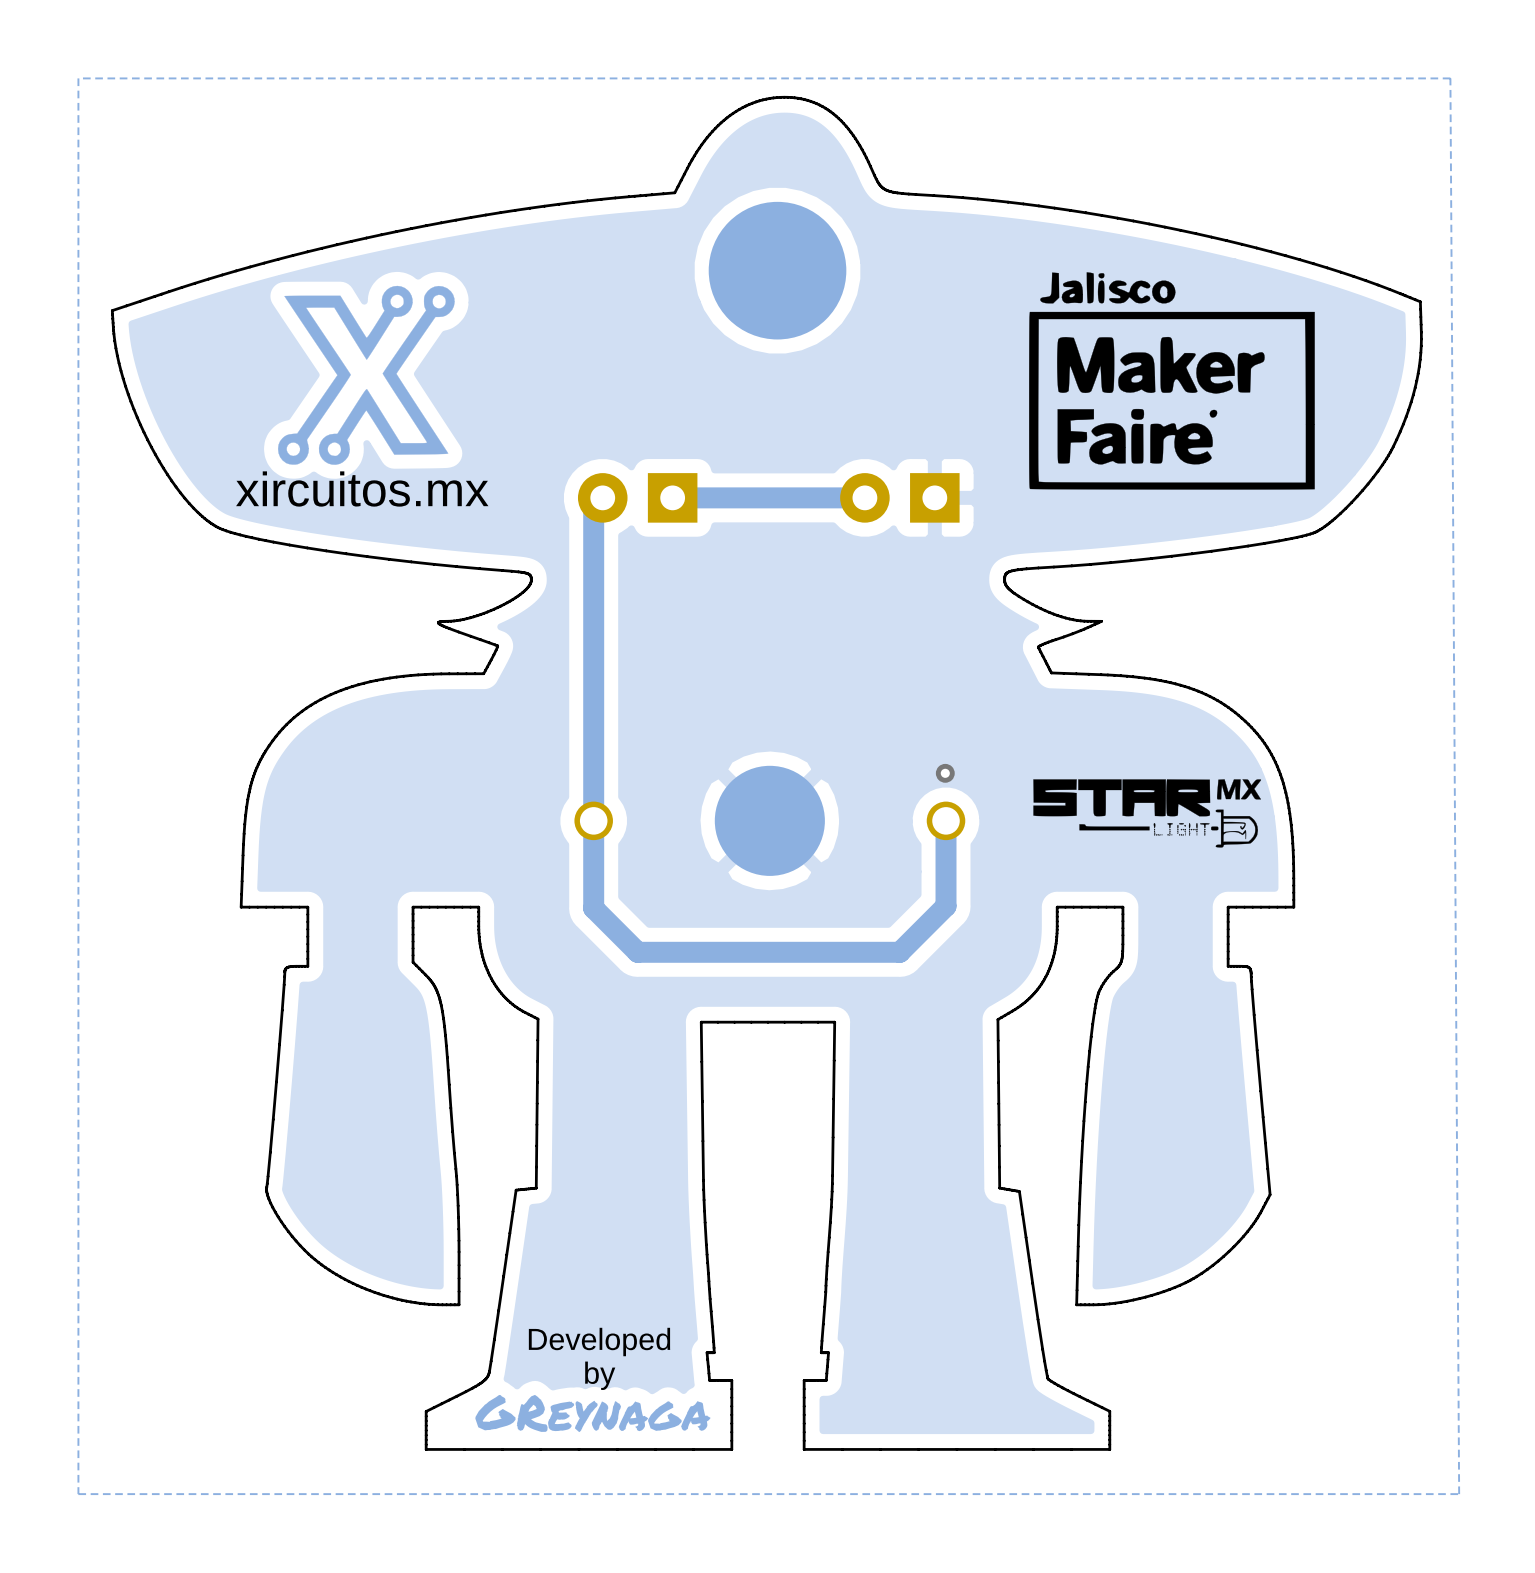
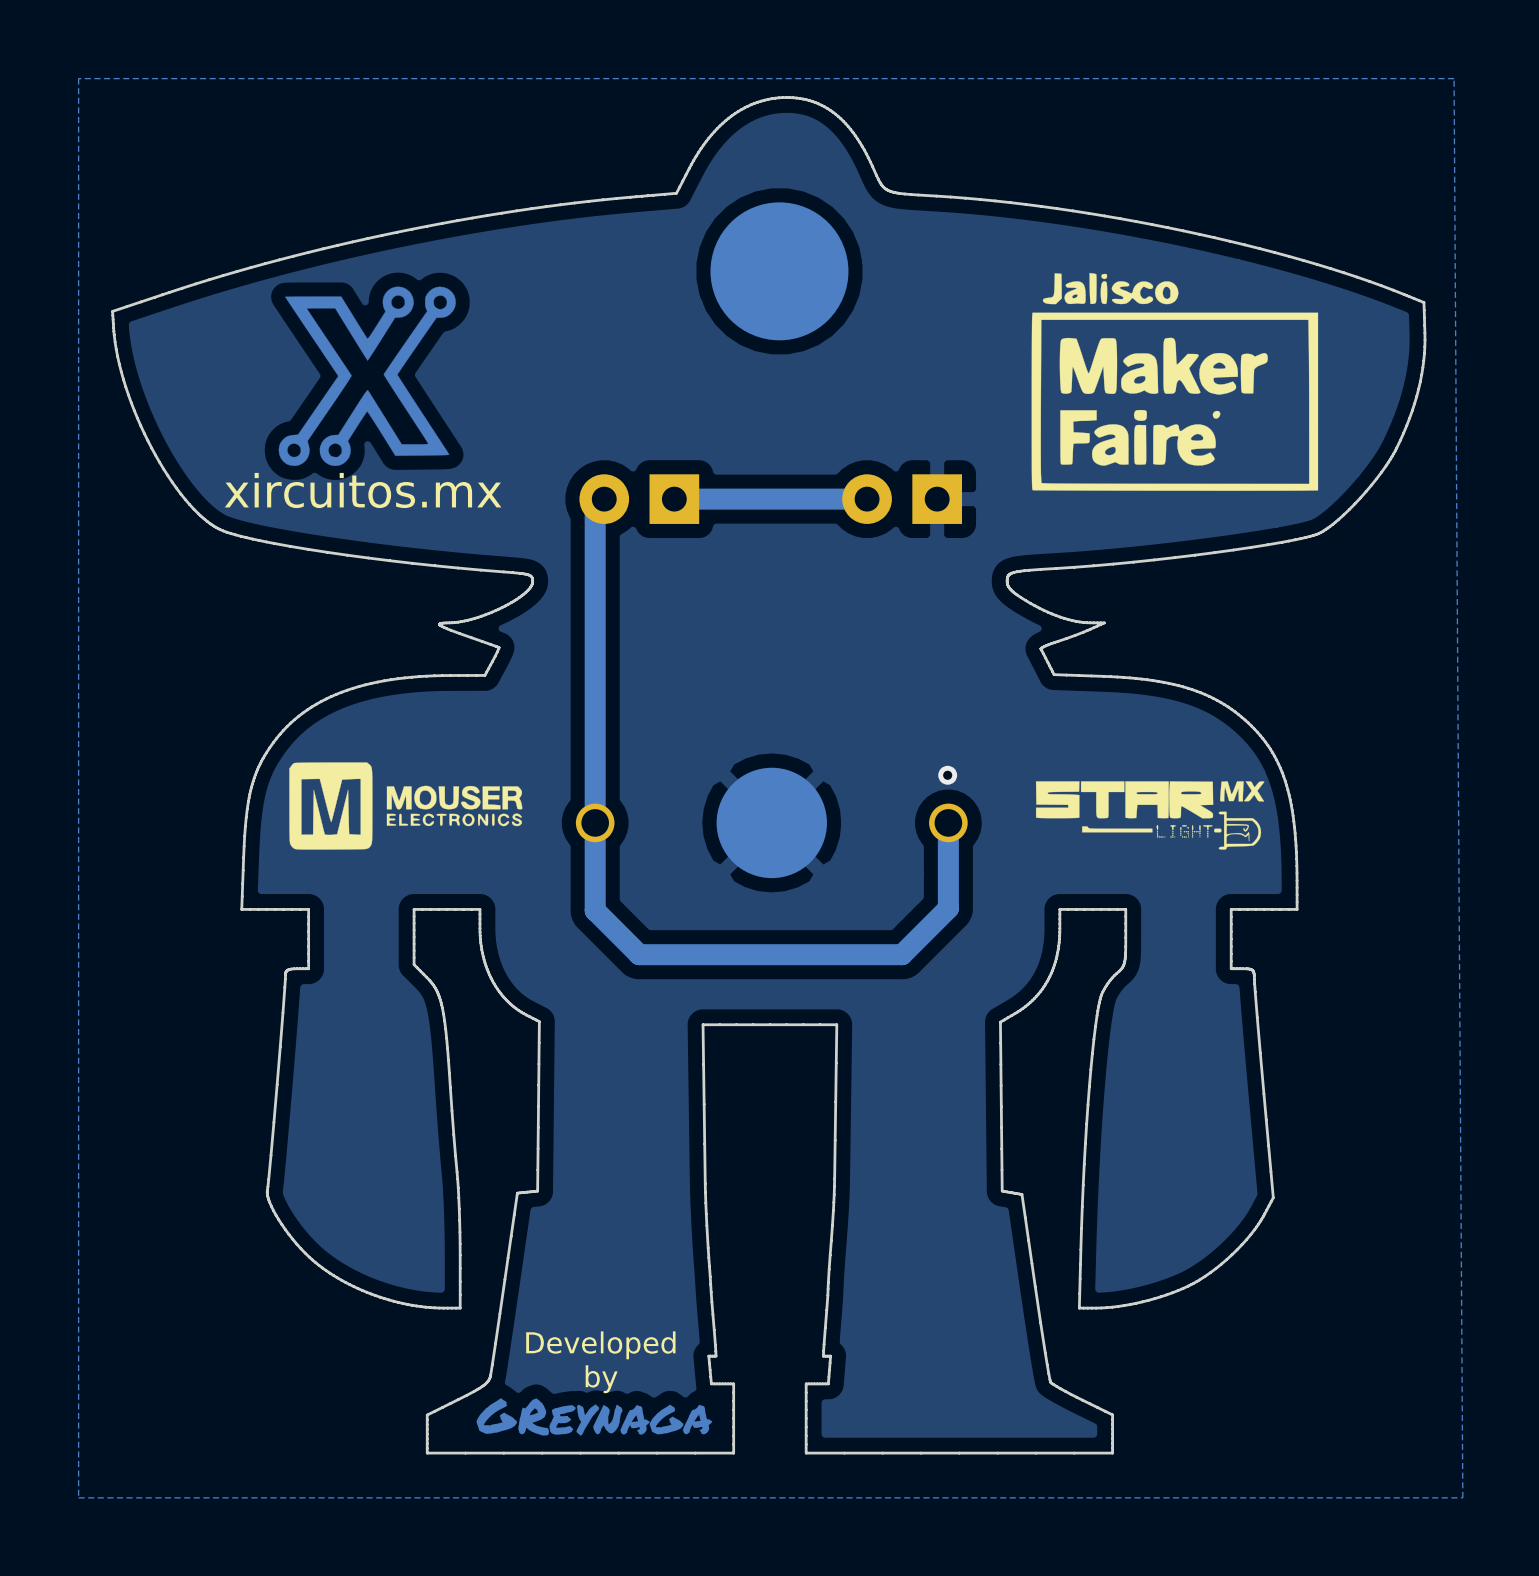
drawing: none -> [289, 762, 523, 850]

